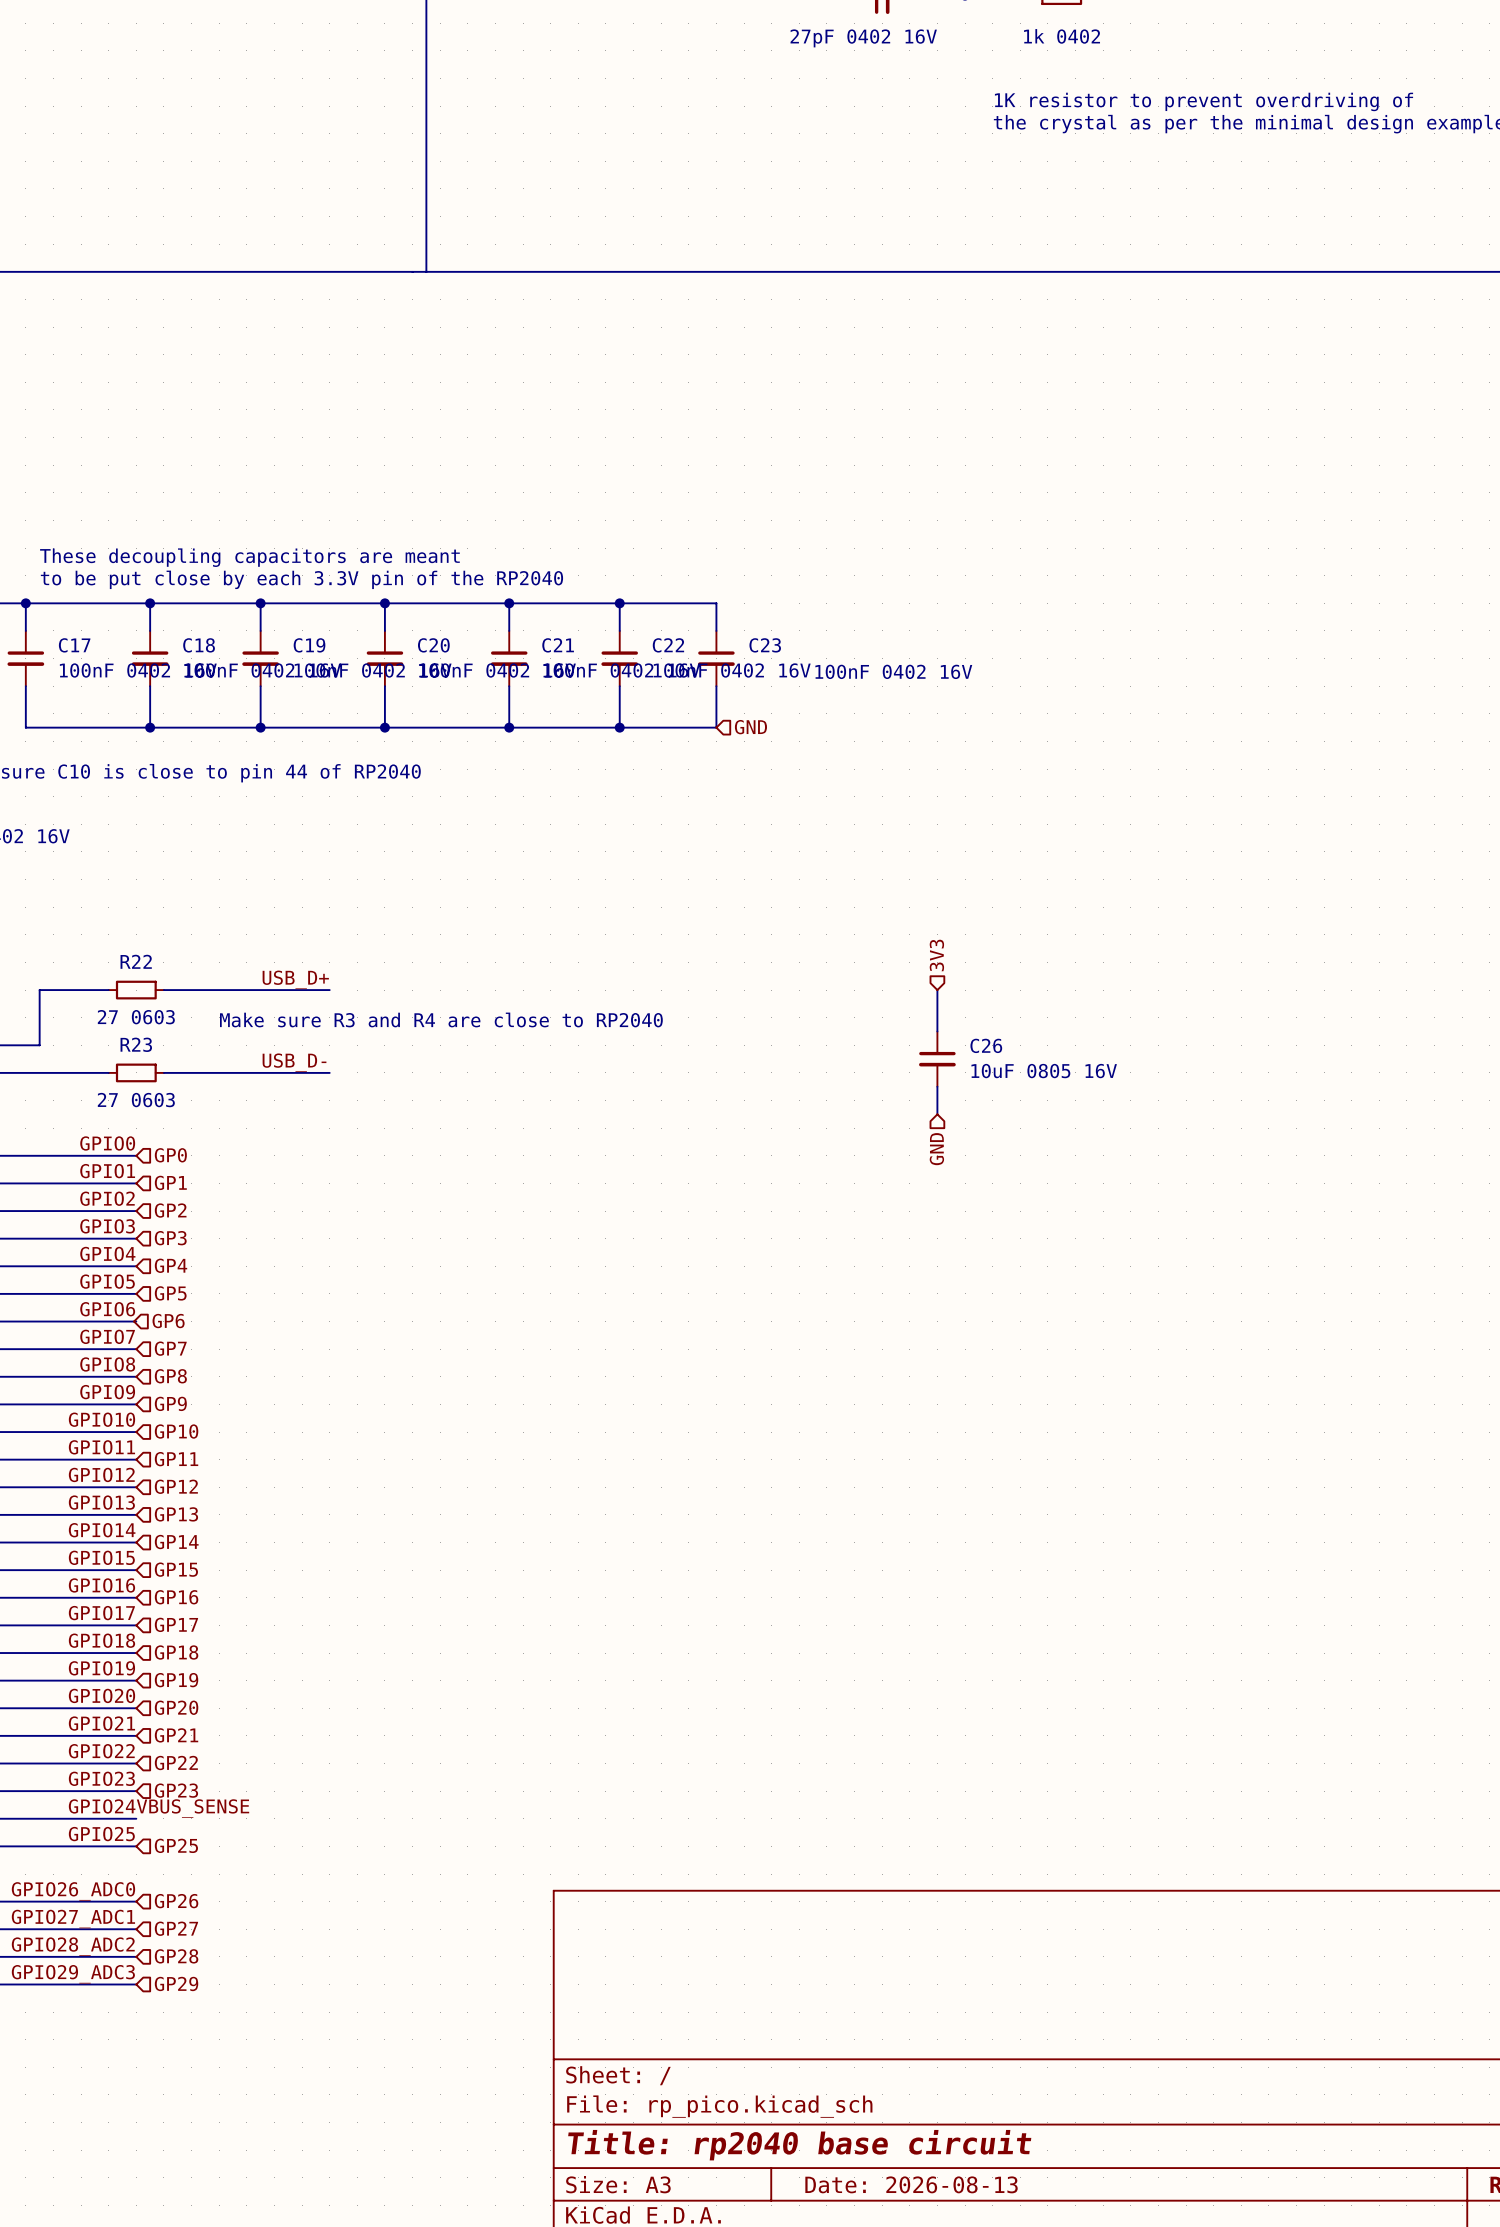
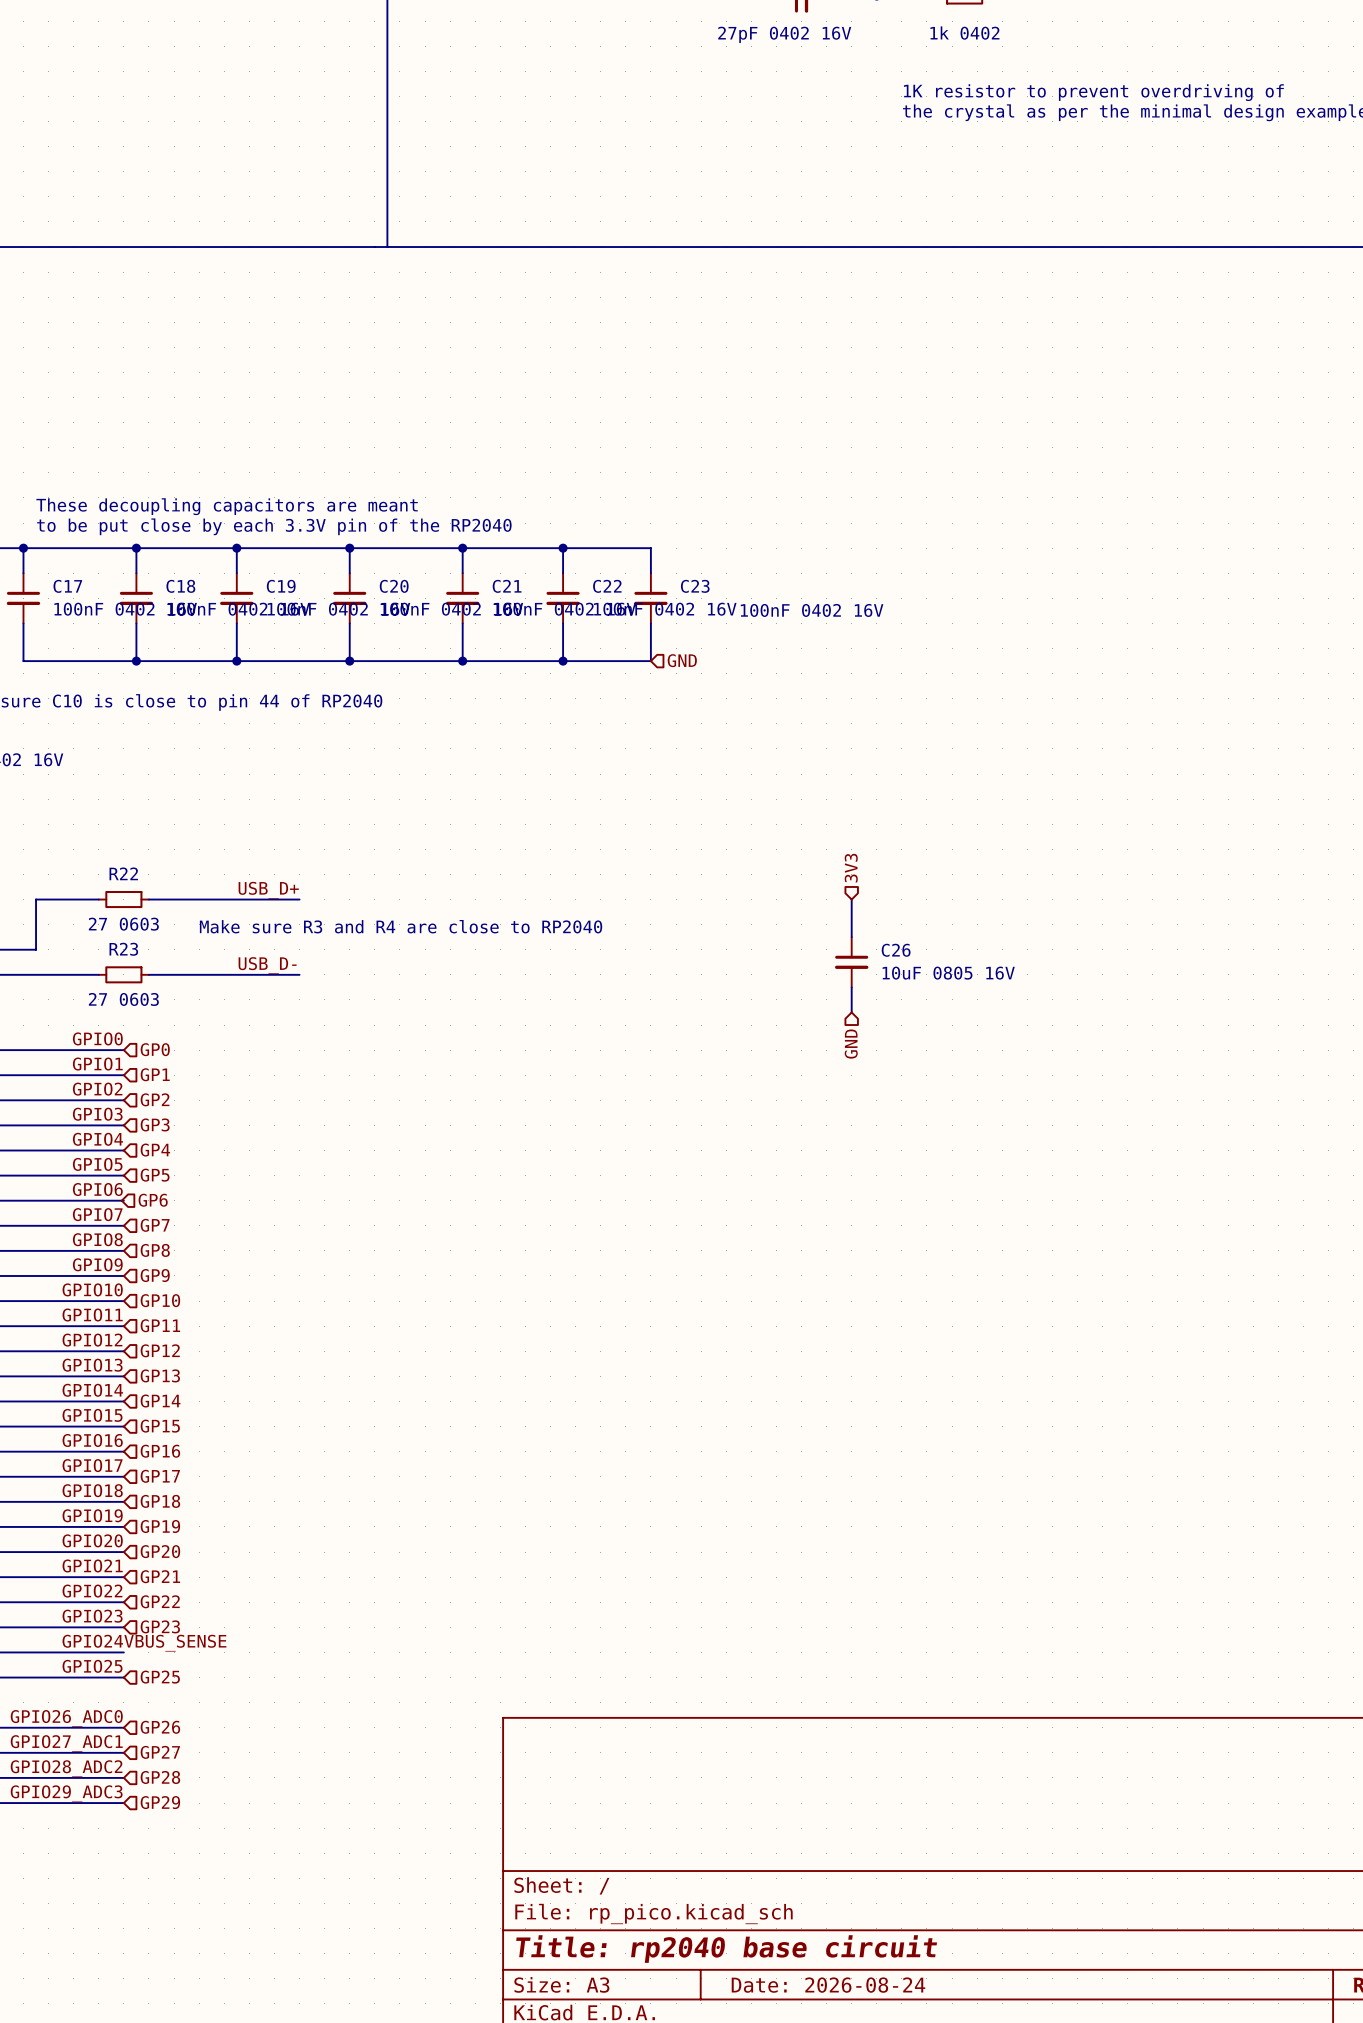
title block: Date: 2026-08-13 (911, 2184) -> Date: 2026-08-24 (828, 1985)

